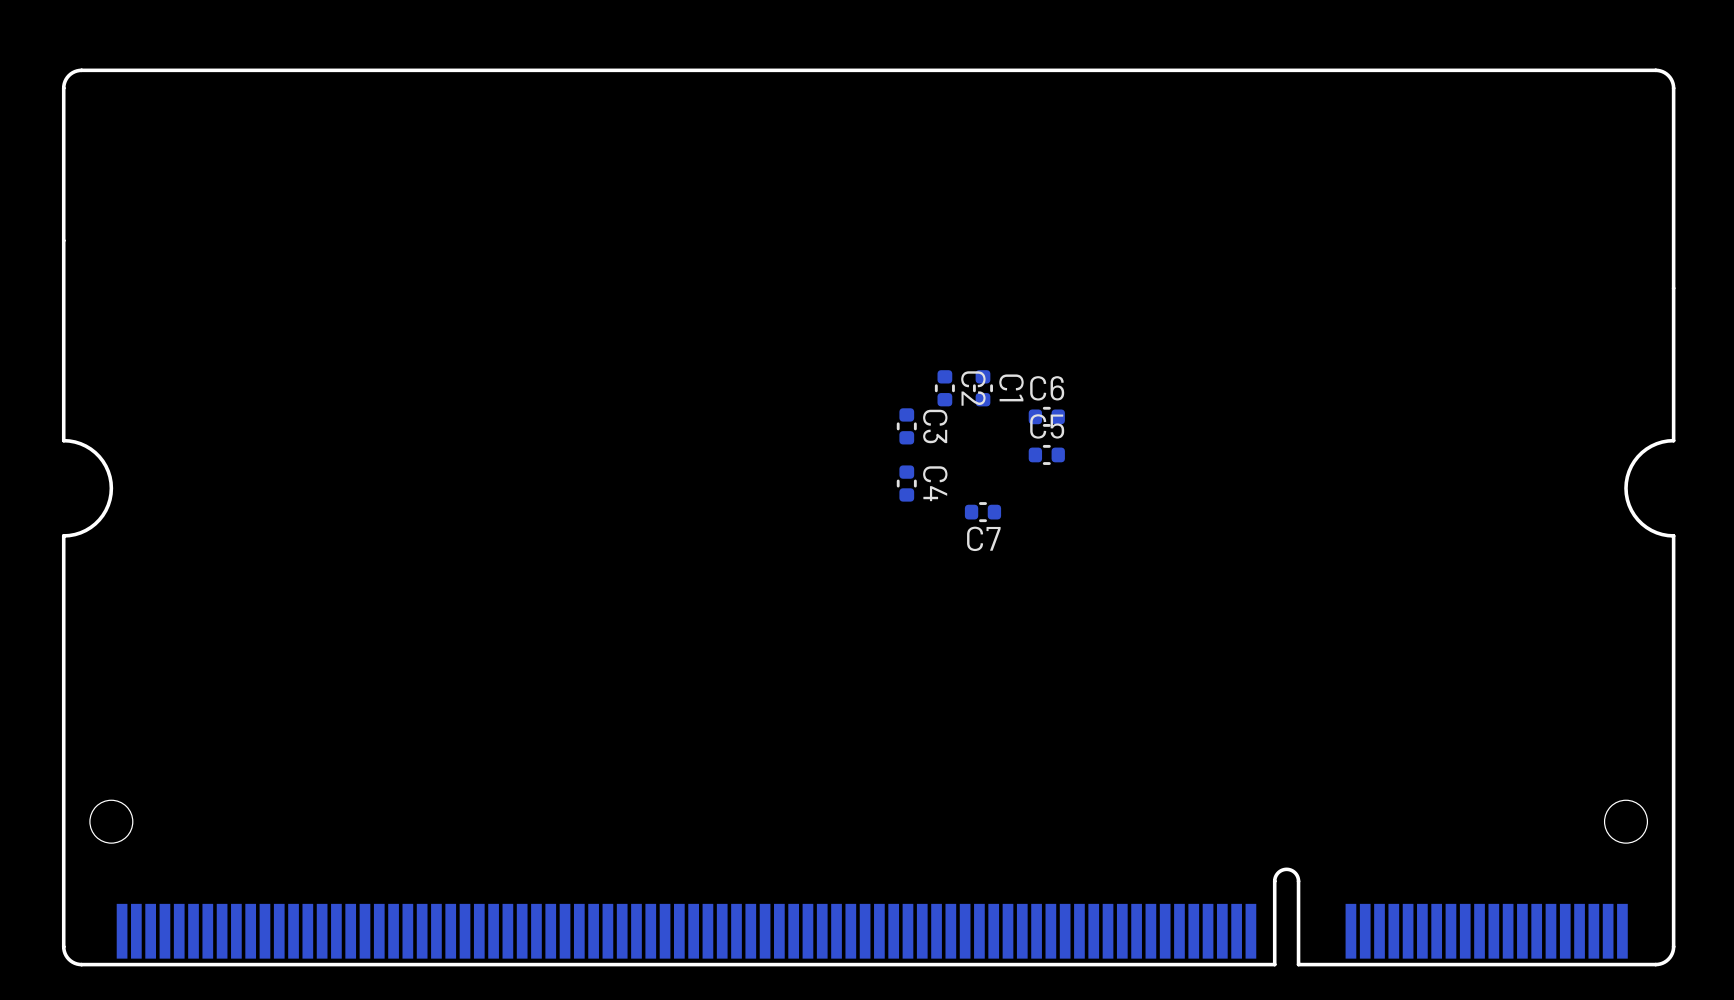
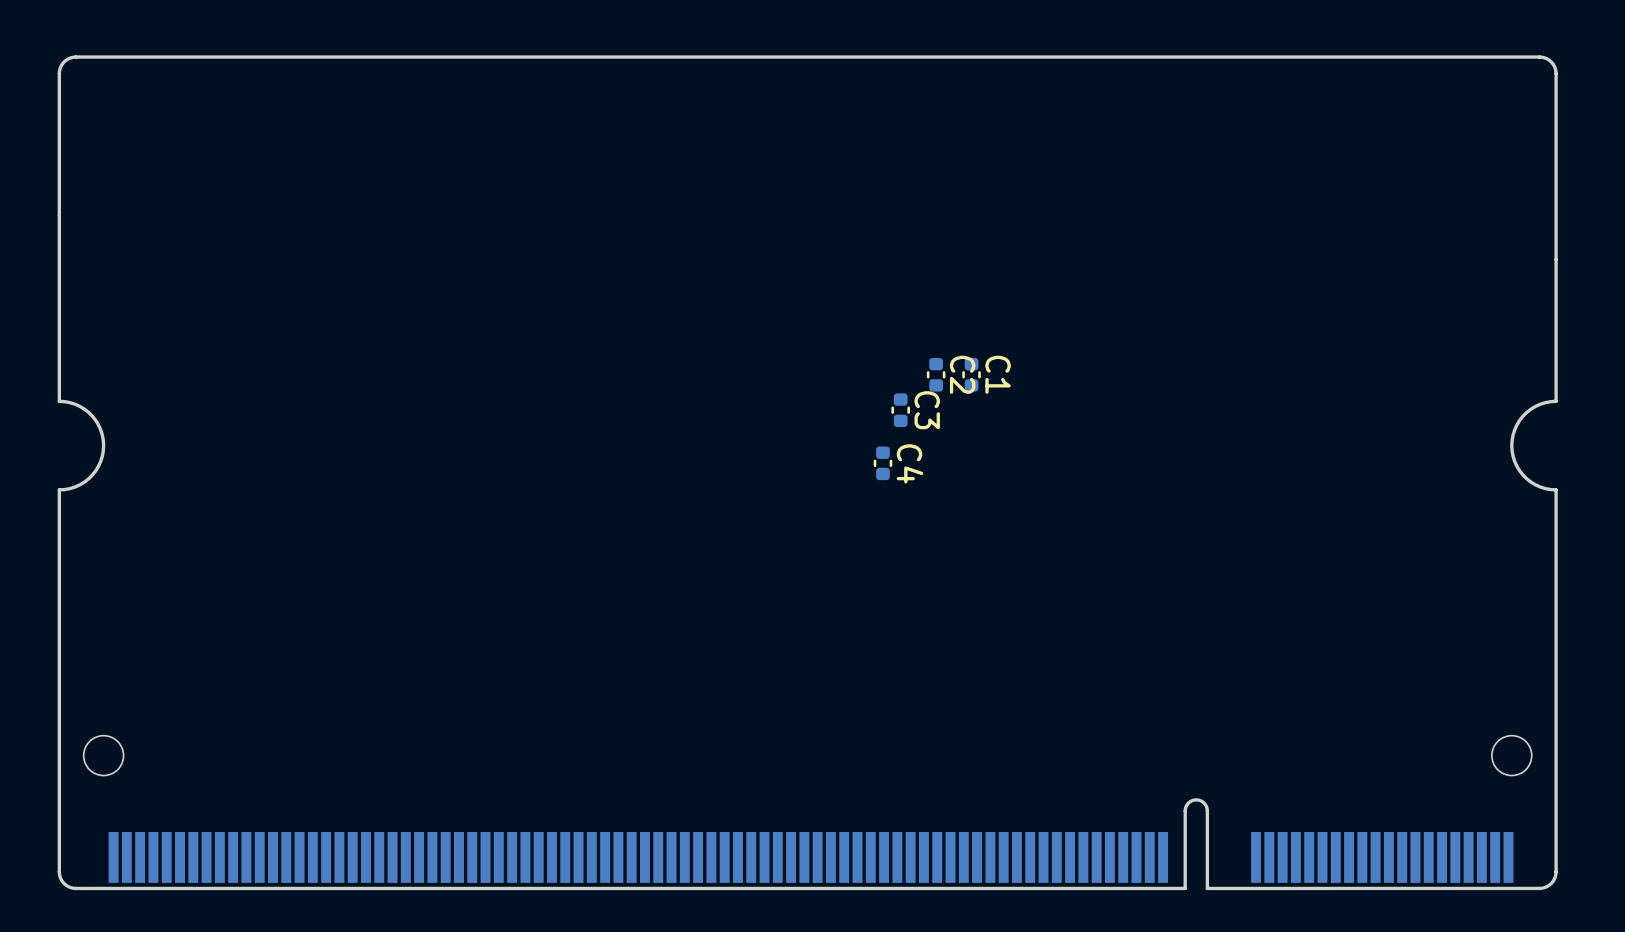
C2 position: (944, 388) -> (936, 374)
C1 position: (982, 388) -> (971, 374)
C6: (1046, 416) -> none
C3 position: (906, 426) -> (900, 410)
C5: (1046, 454) -> none
C4 position: (906, 483) -> (882, 463)
C7: (982, 512) -> none

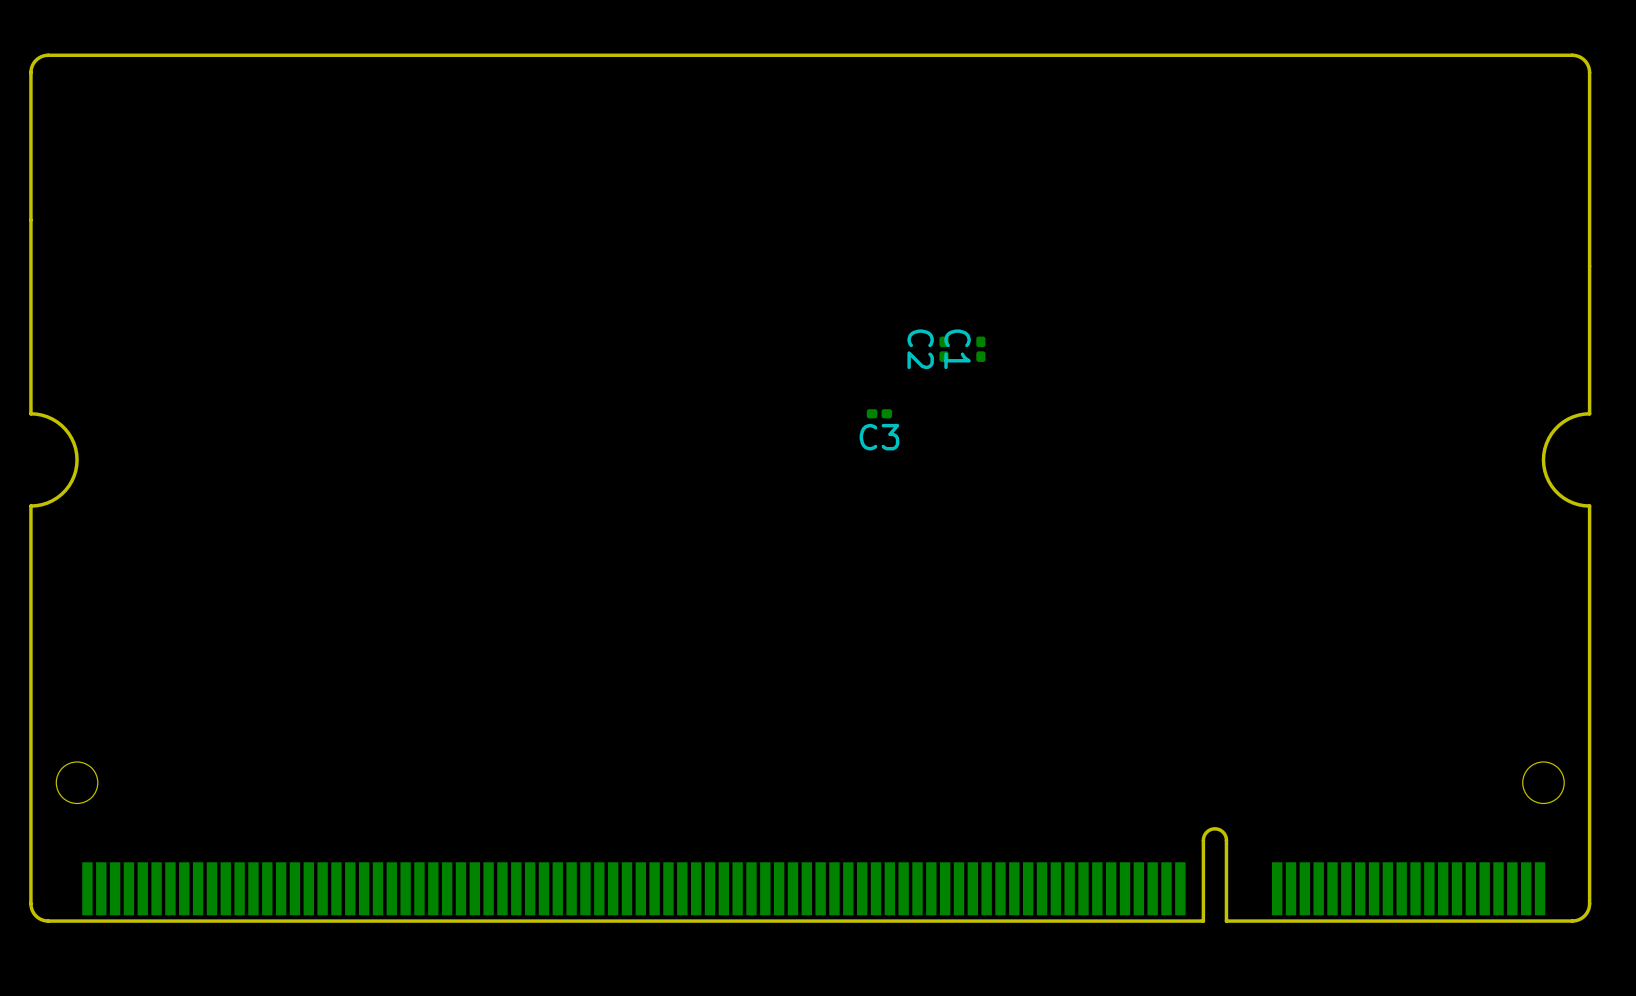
C2 footprint: [926, 357, 946, 392] -> [939, 336, 949, 362]
C1 footprint: [962, 357, 981, 392] -> [976, 336, 986, 362]
C2 name position: C2 (962, 374) -> C2 (920, 349)
C1 name position: C1 (998, 374) -> C1 (957, 349)
C3 footprint: [891, 393, 911, 428] -> [866, 409, 893, 419]
C4: (882, 463) -> none

